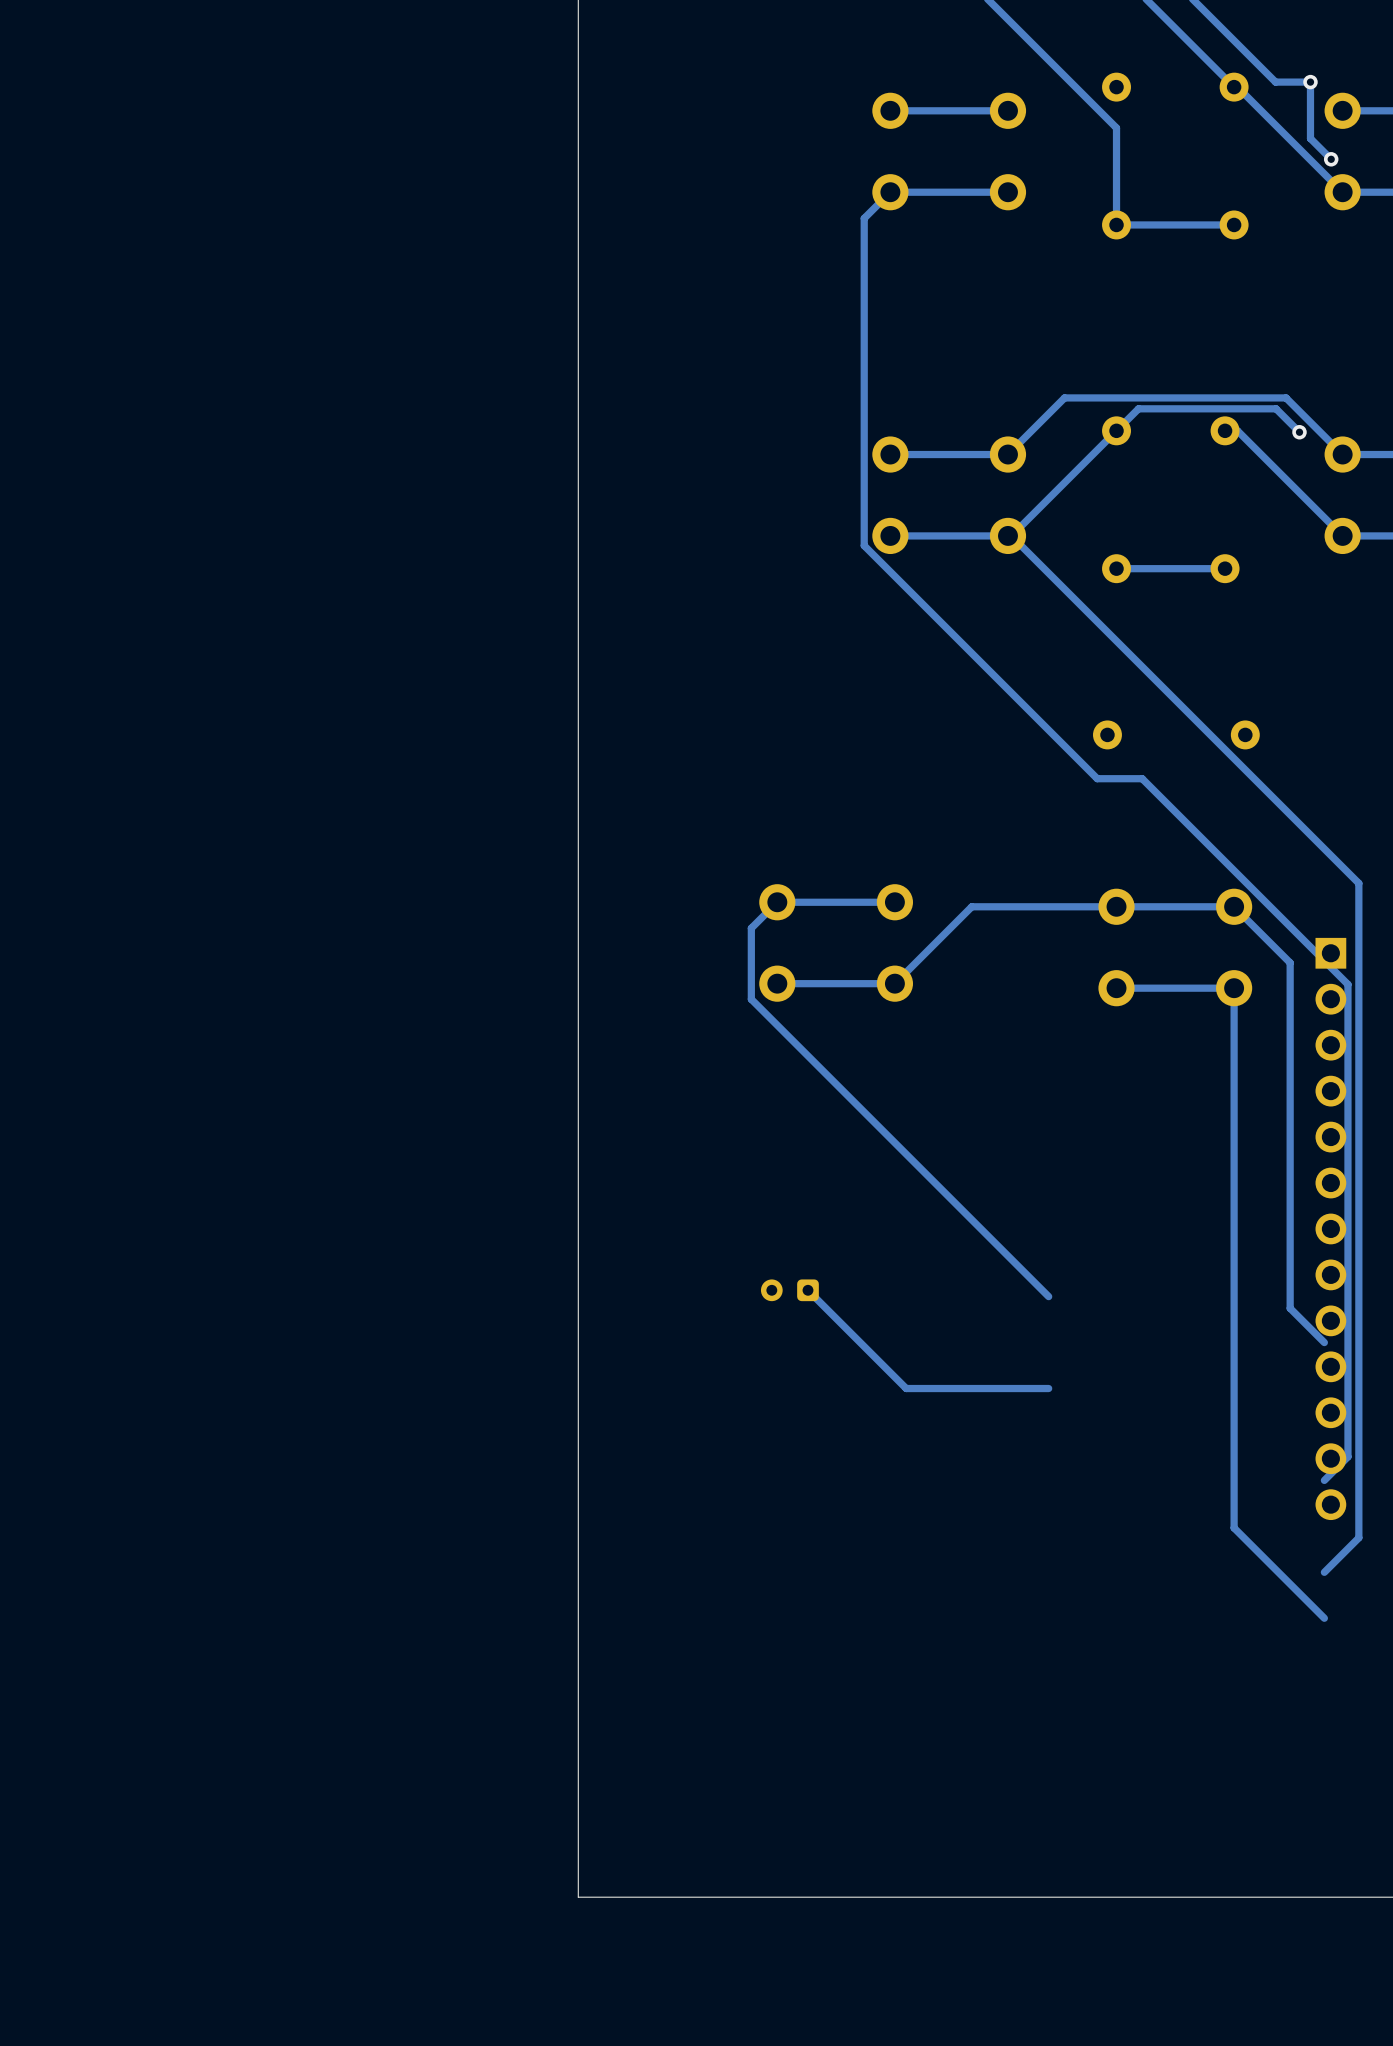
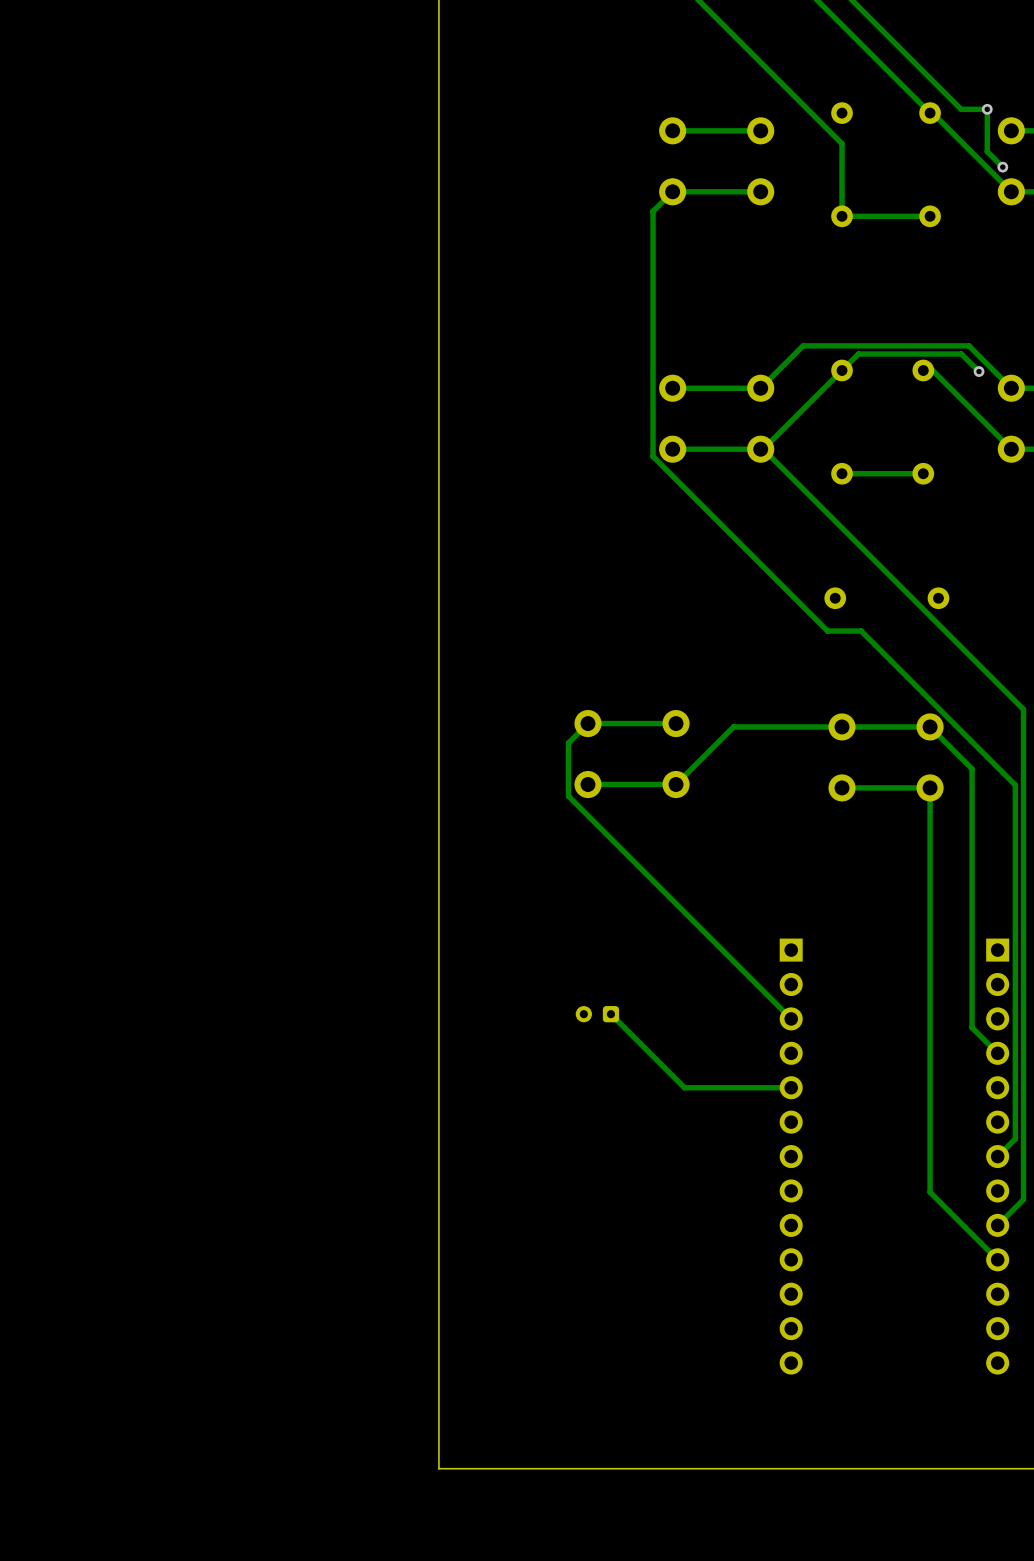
part: (1330, 1228) -> none
part: none -> (791, 1156)
part: none -> (997, 1156)

